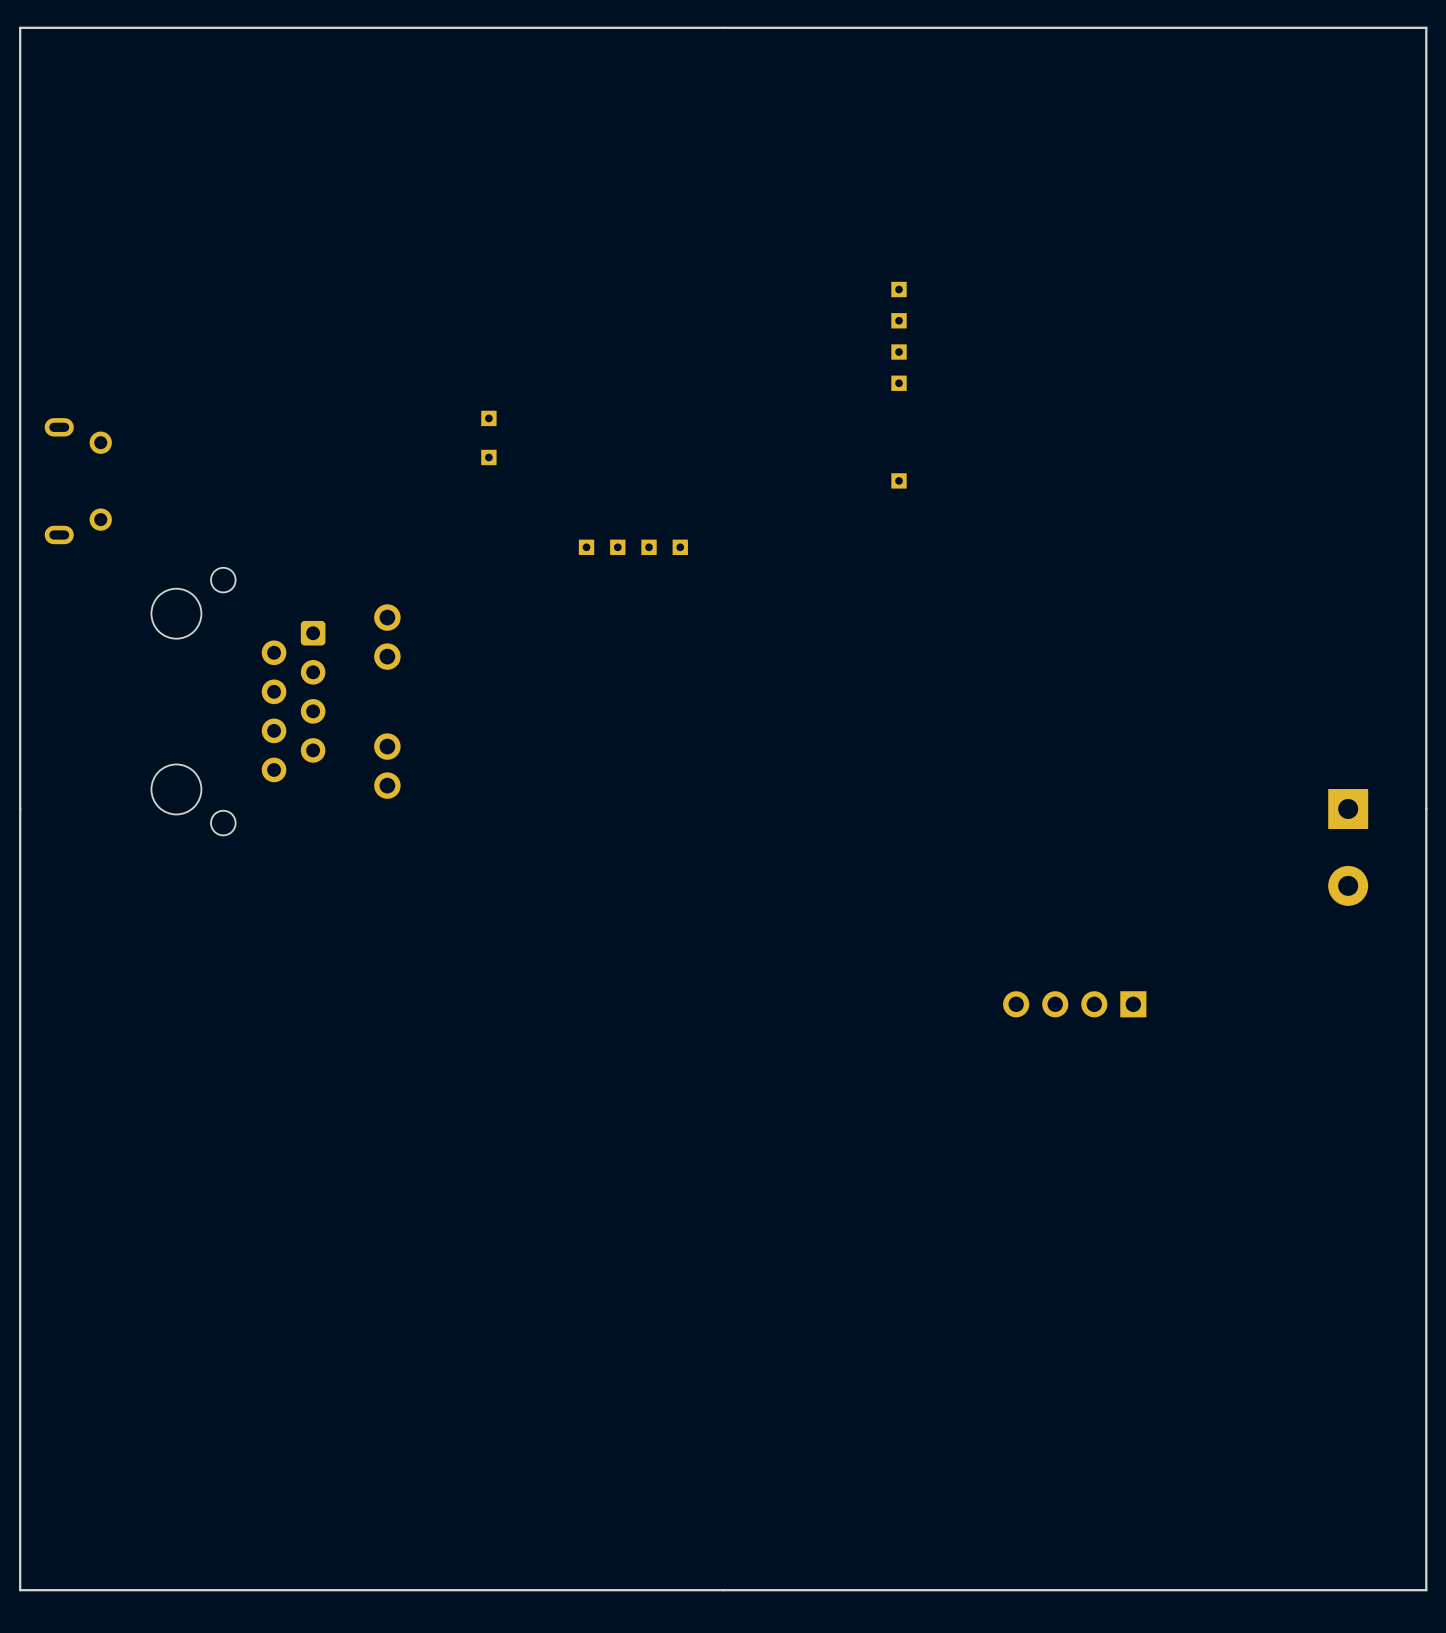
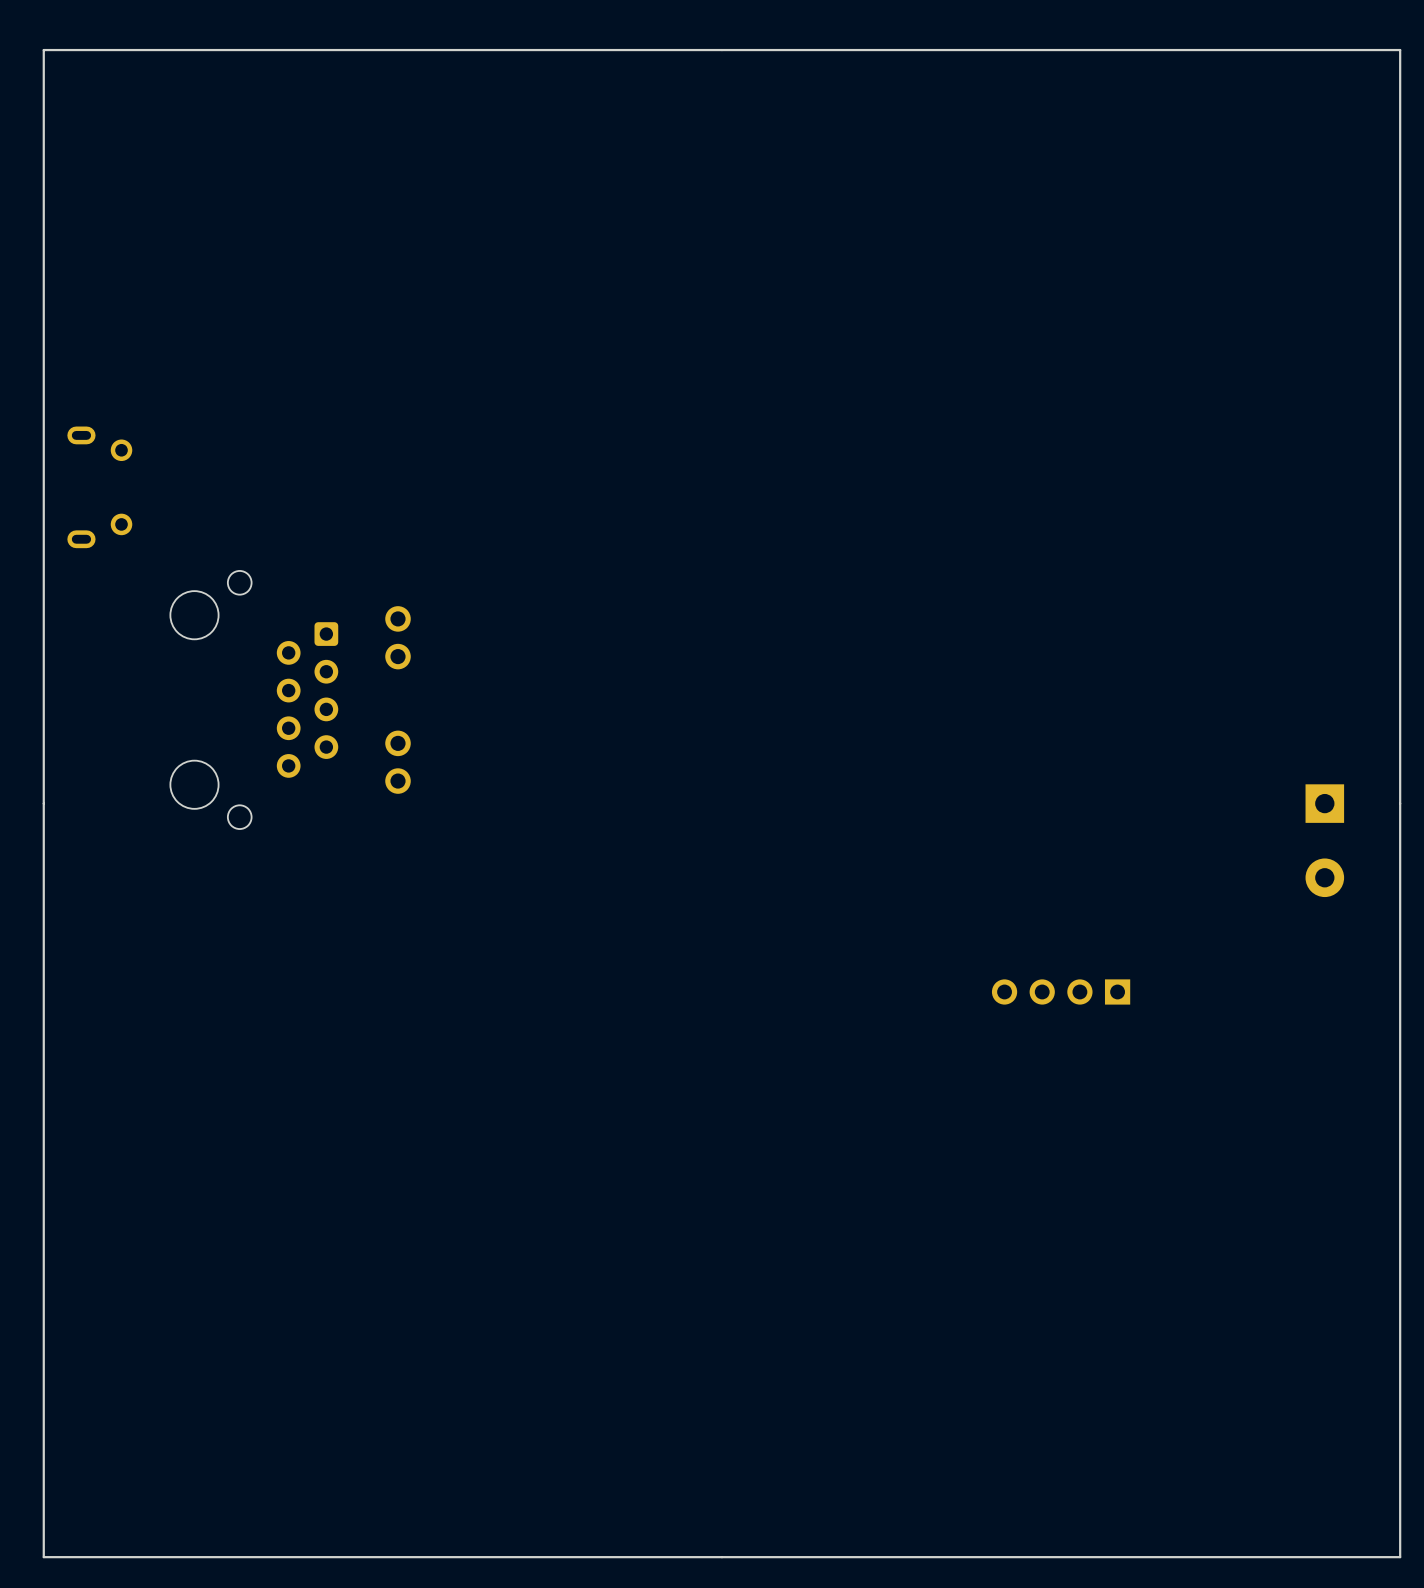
part: (899, 289) -> none
part: (899, 320) -> none
part: (899, 352) -> none
part: (899, 383) -> none
part: (488, 418) -> none
part: (488, 457) -> none
part: (899, 480) -> none
part: (586, 547) -> none
part: (617, 547) -> none
part: (649, 547) -> none
part: (680, 547) -> none

